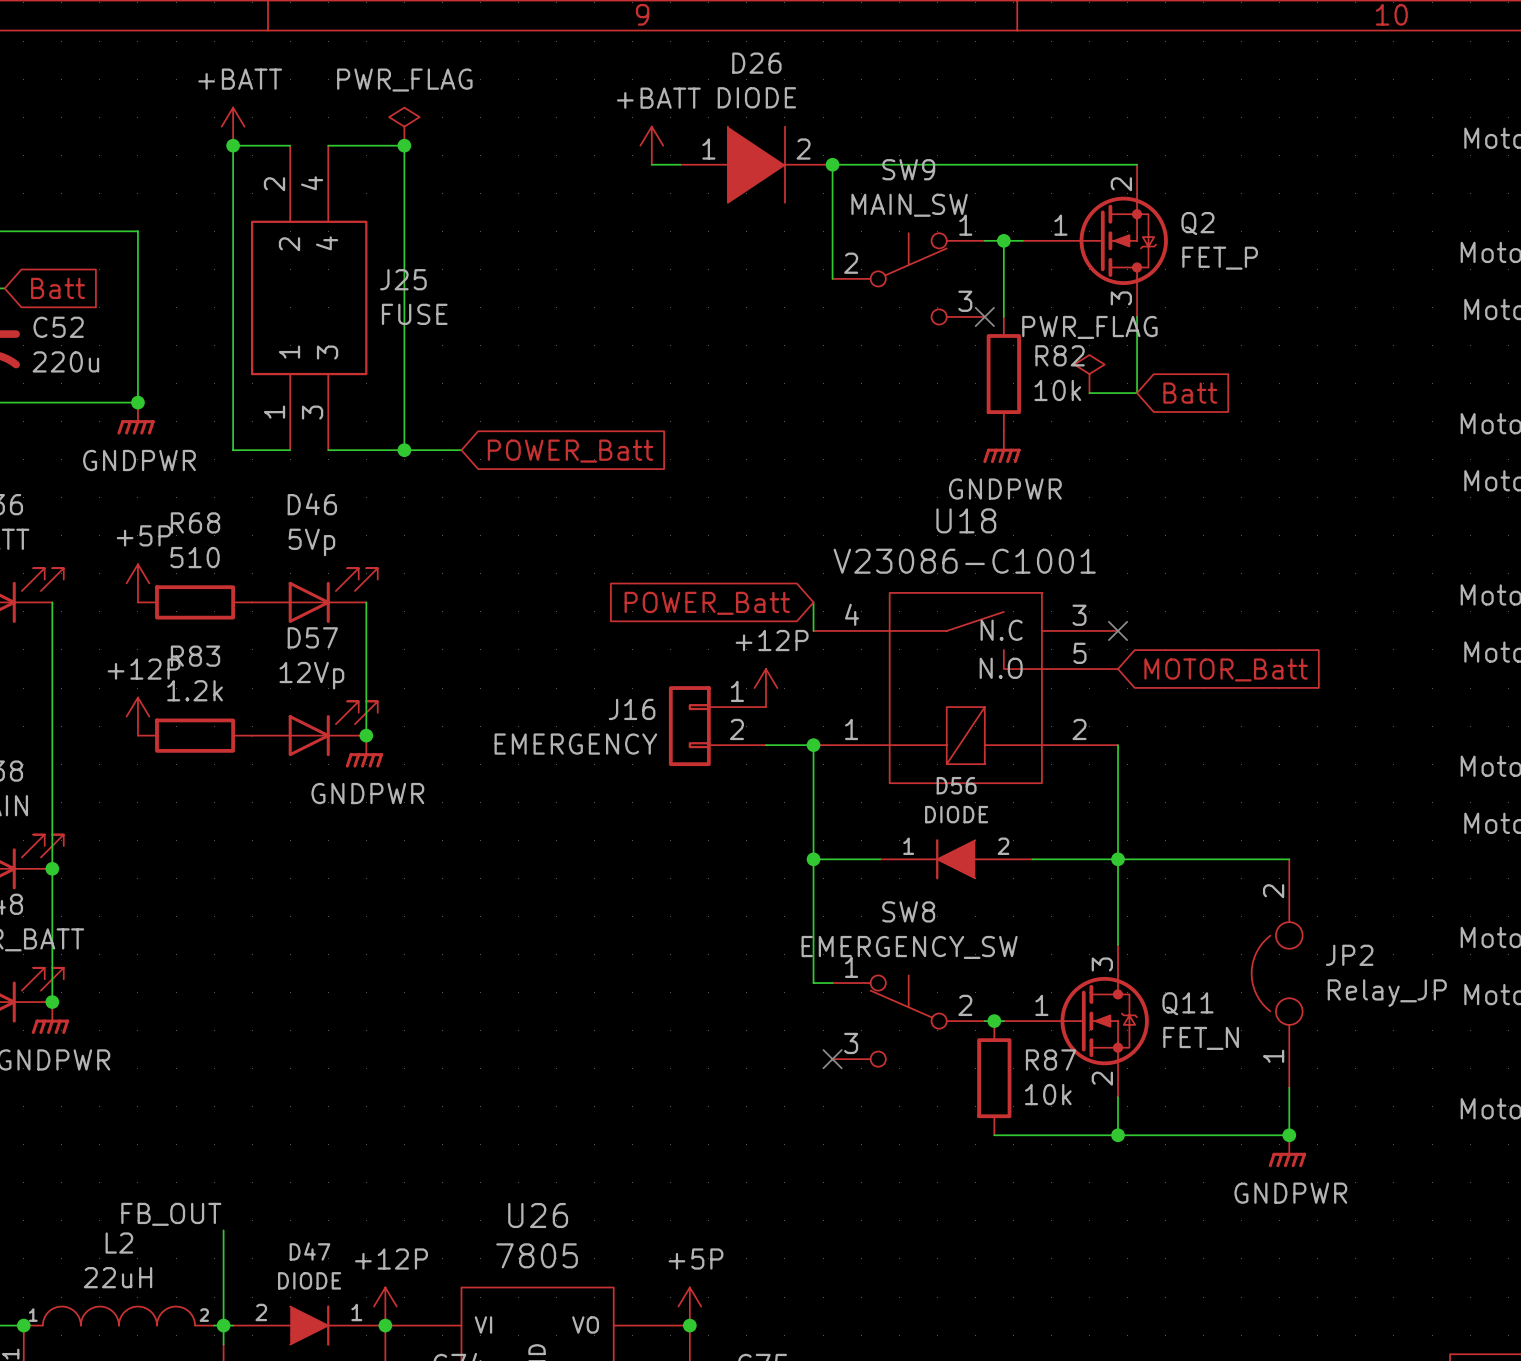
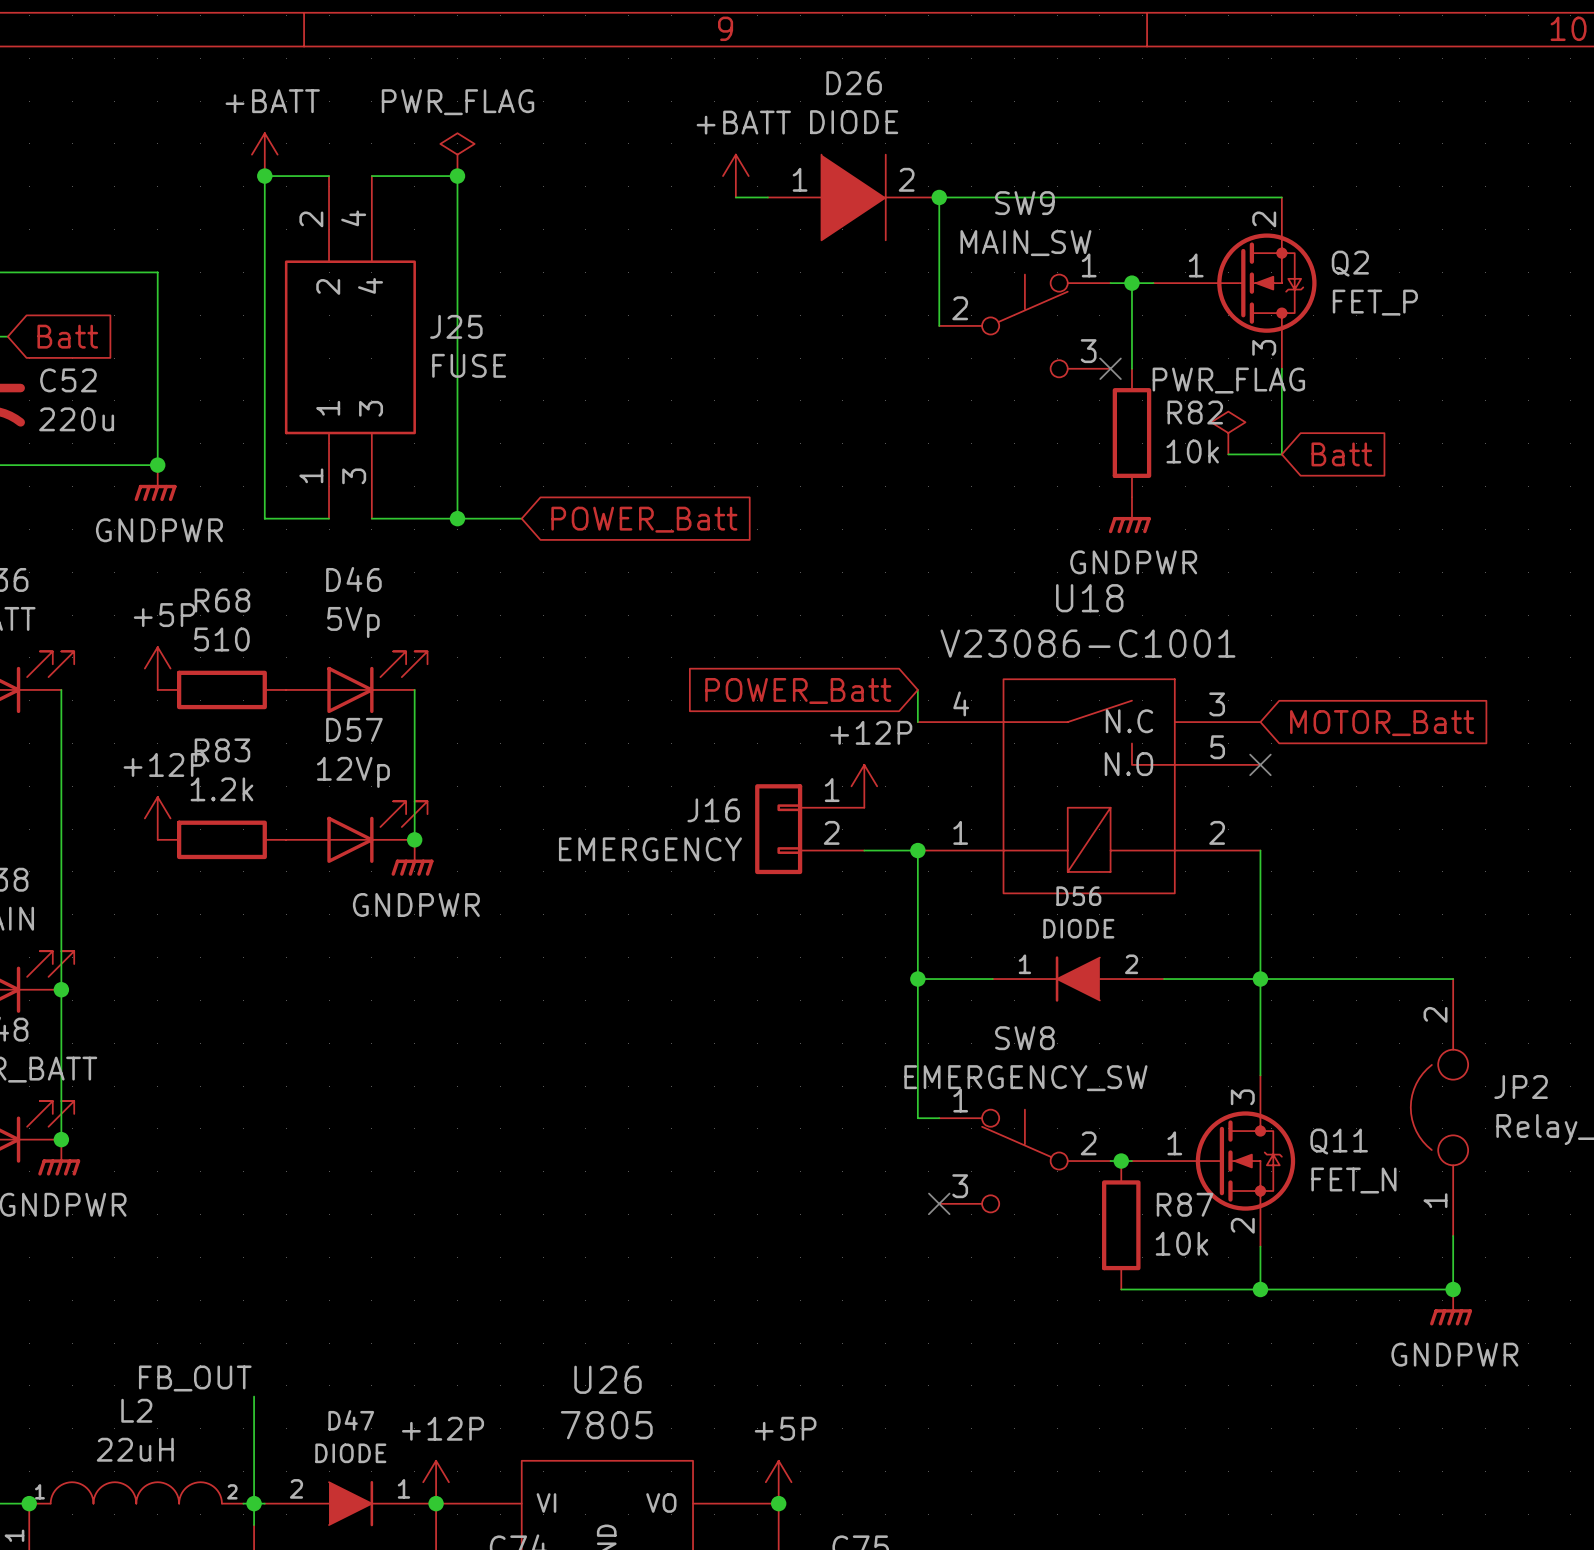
no-connect mark position: (1118, 630) -> (1260, 764)
global label position: MOTOR_Batt (1226, 669) -> MOTOR_Batt (1382, 723)

